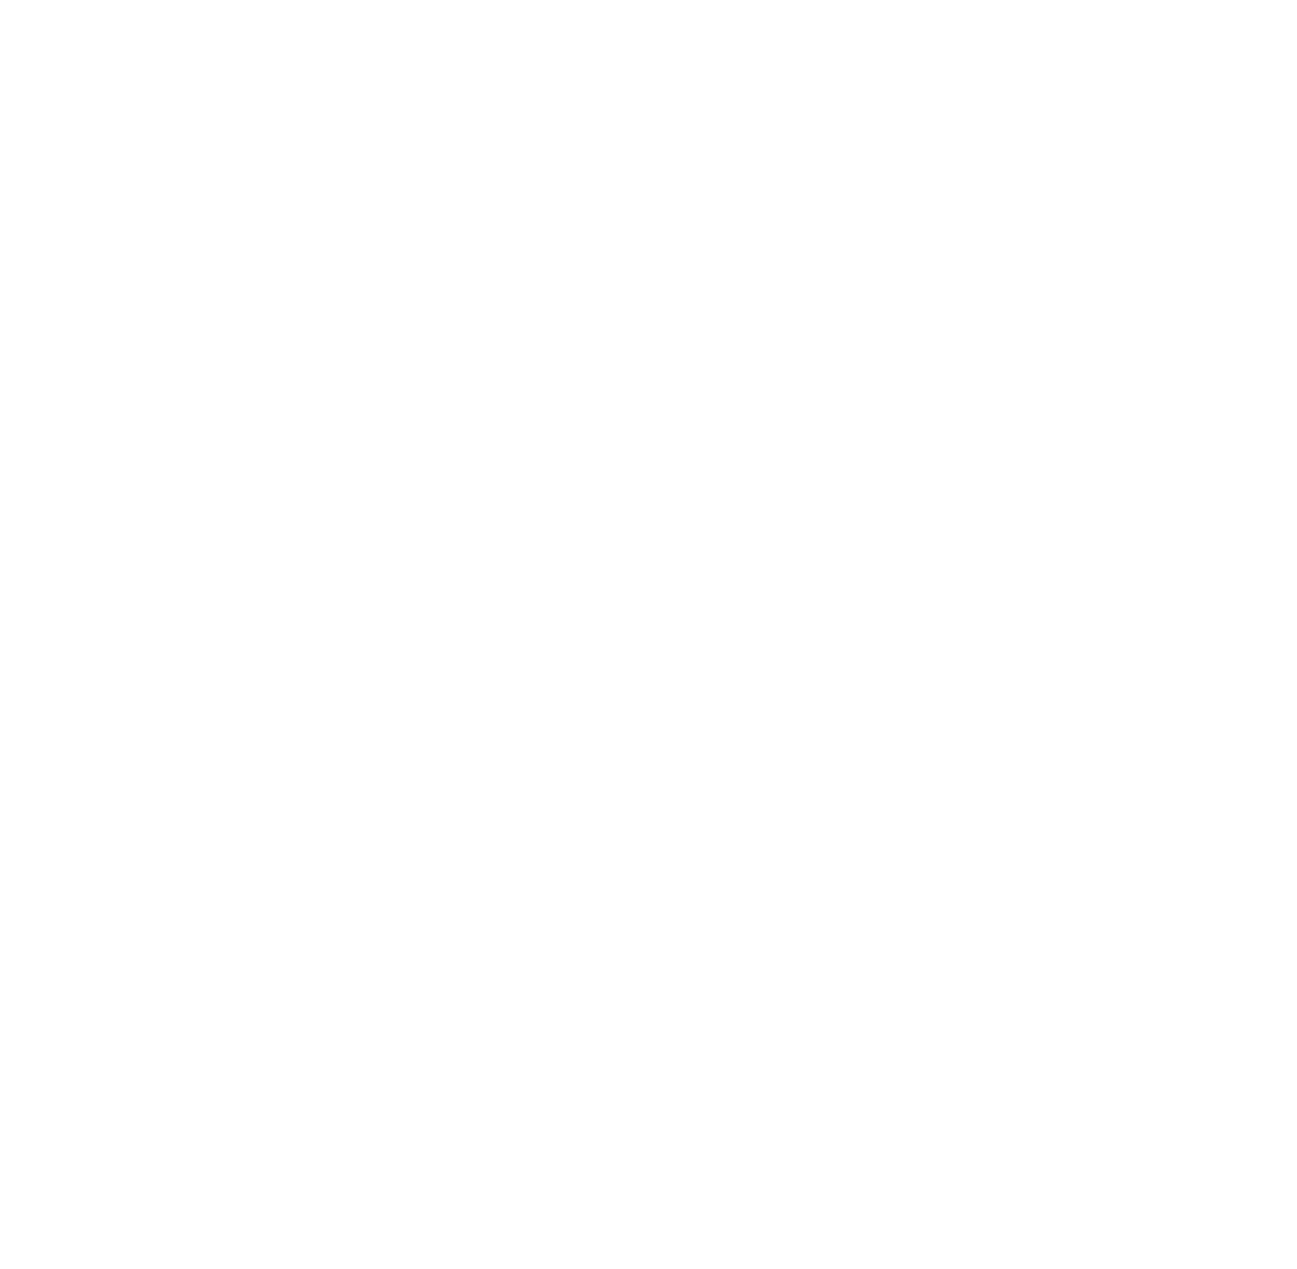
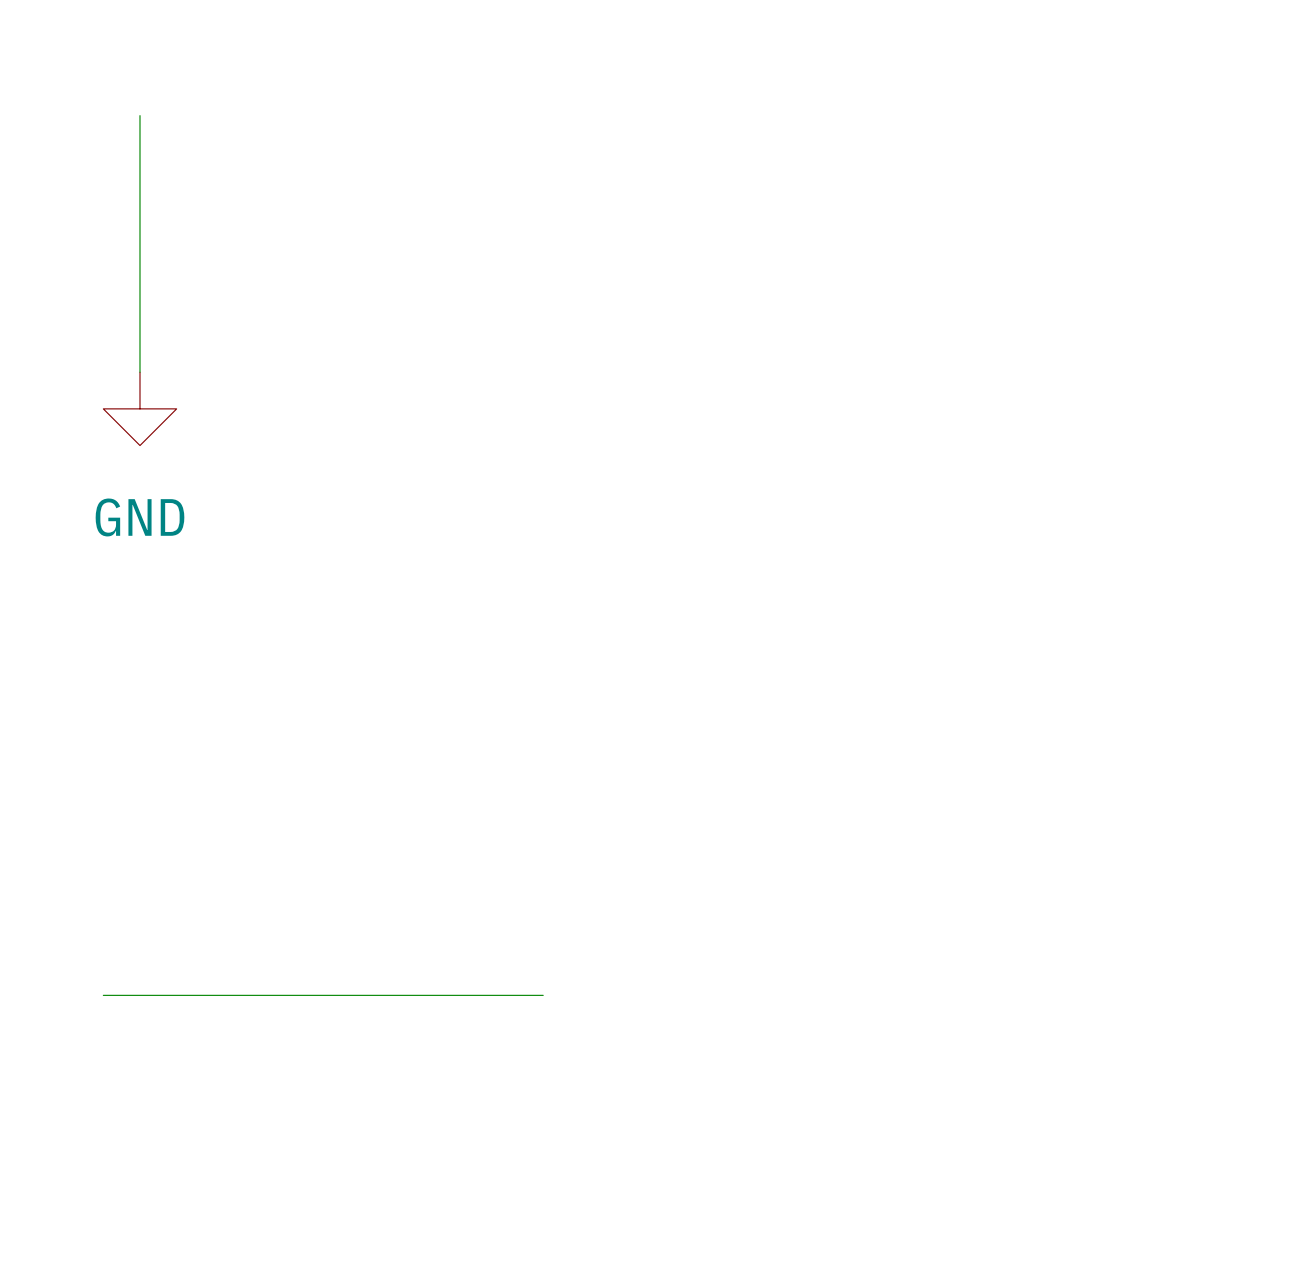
wire: none -> (139, 115) (139, 372)
power symbol: none -> GND (139, 408)
wire: none -> (103, 995) (543, 995)

